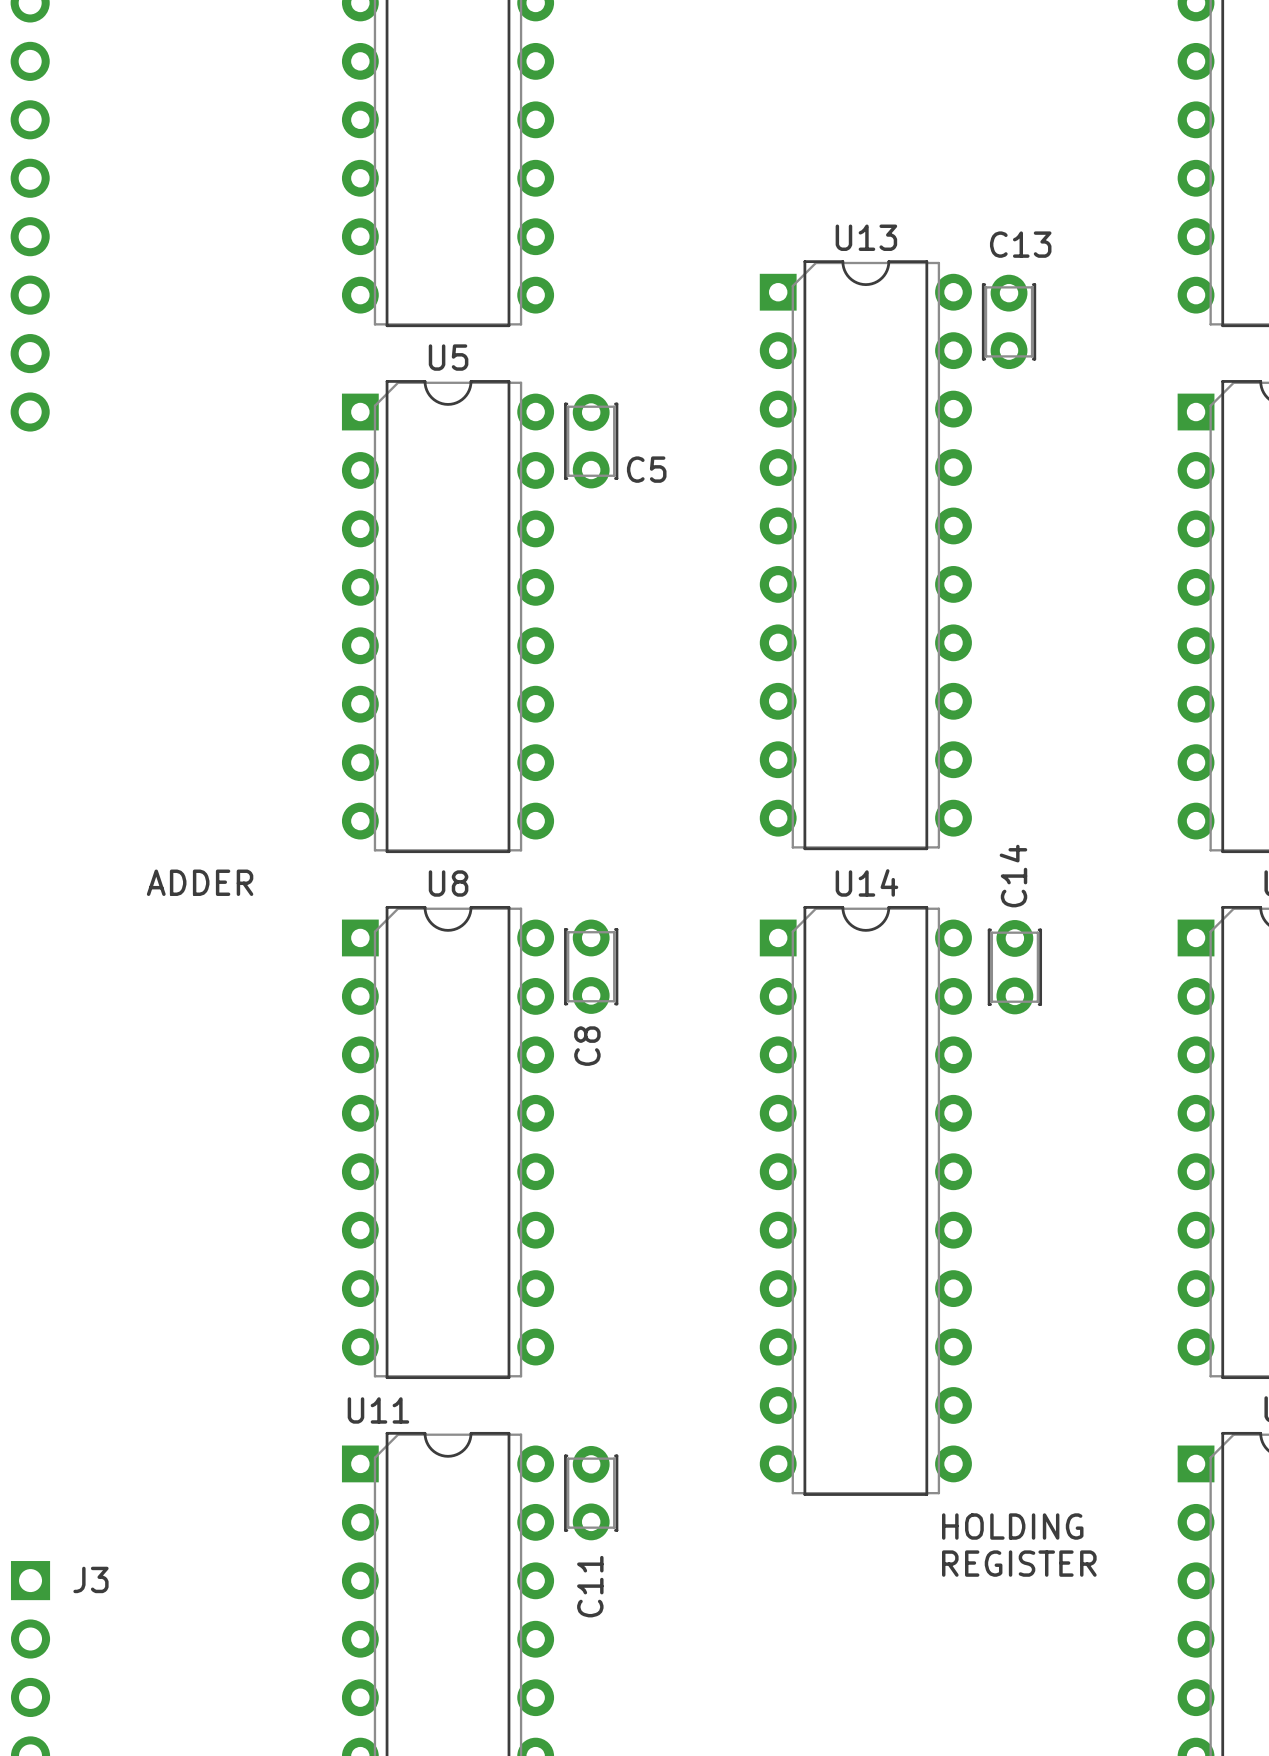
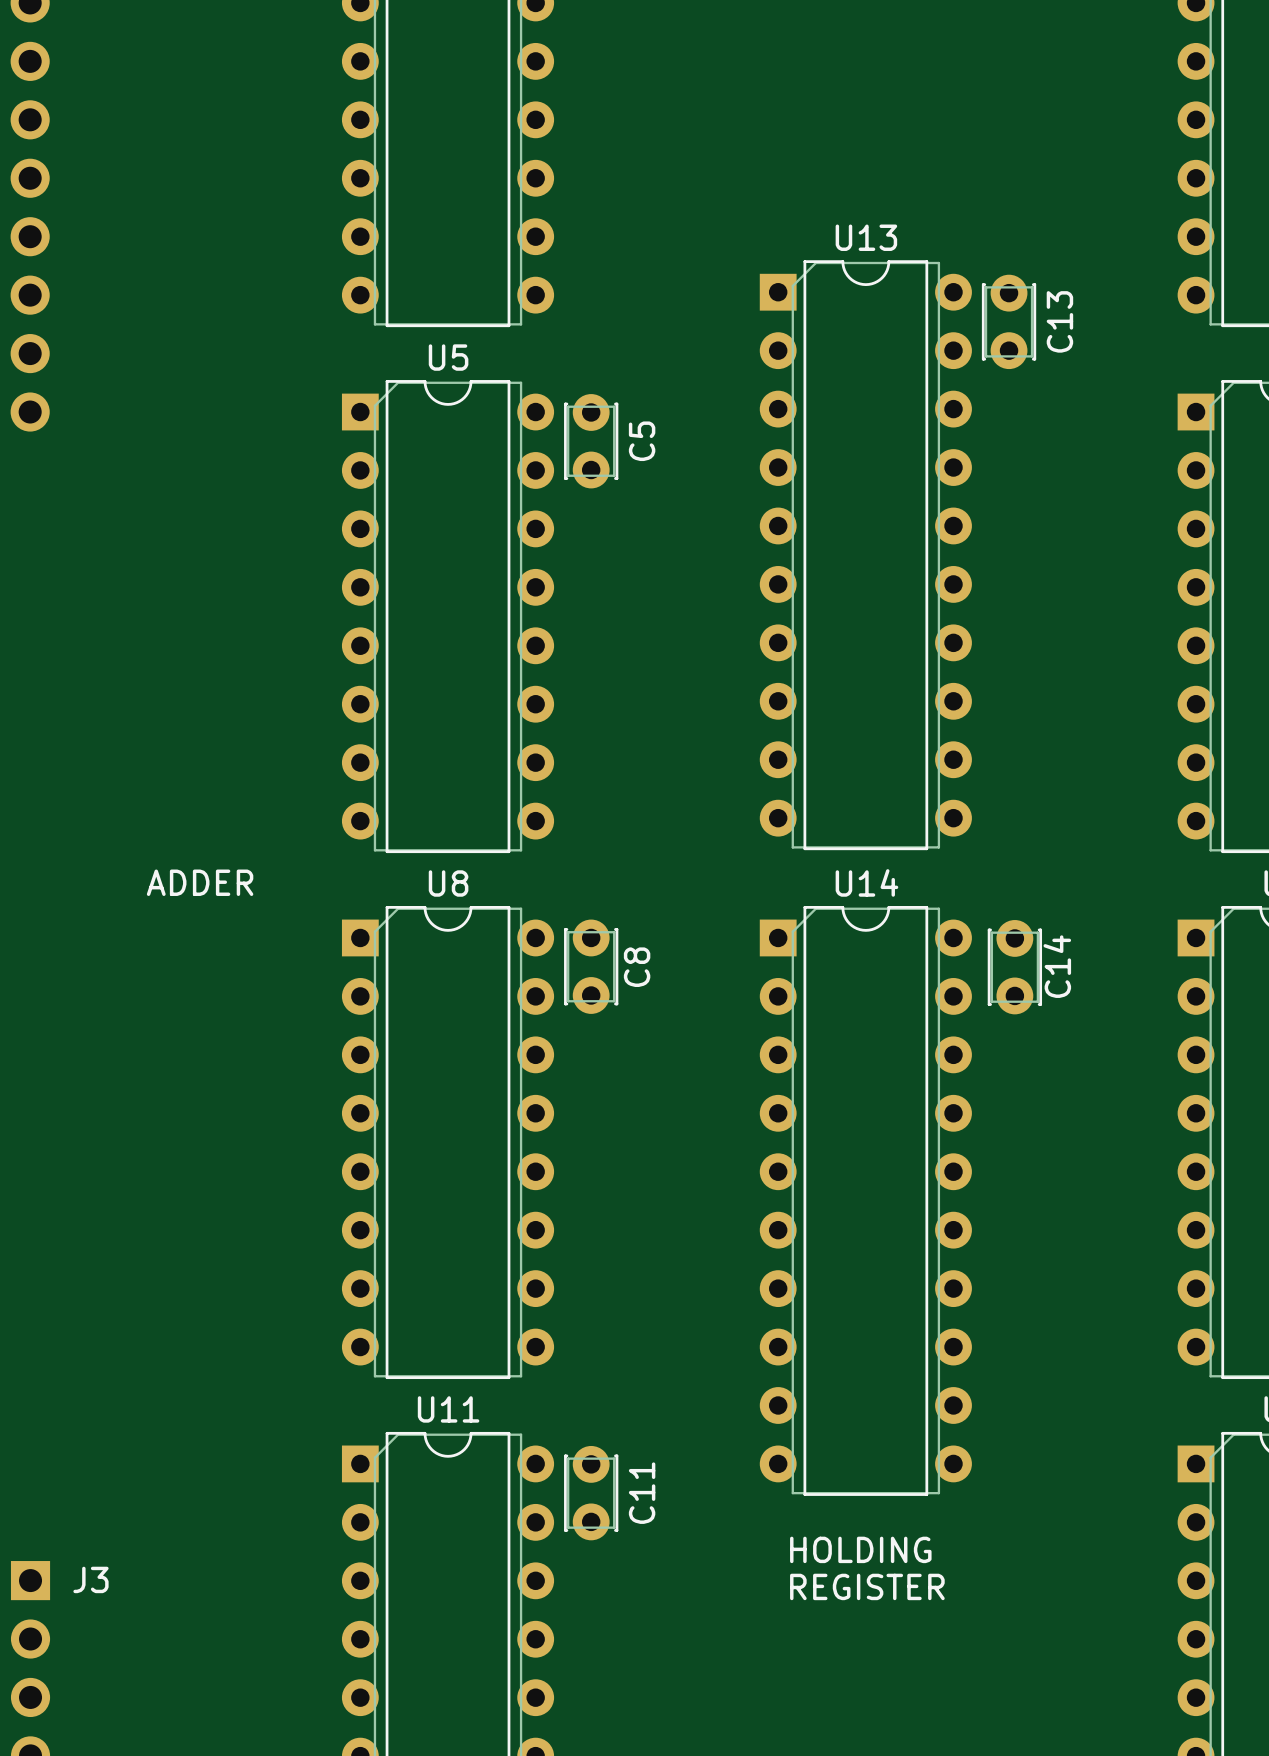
C13 name rotation: 0° (1020, 244) -> 90° counterclockwise (1059, 321)
C13 name position: C13 (1020, 244) -> C13 (1059, 321)
C5 name rotation: 0° (646, 469) -> 90° counterclockwise (642, 441)
C14 name position: C14 (1013, 876) -> C14 (1057, 966)
C8 name position: C8 (587, 1046) -> C8 (637, 967)
U11 name position: U11 (378, 1410) -> U11 (448, 1409)
text position: HOLDING (1012, 1526) -> HOLDING (860, 1549)
text position: REGISTER (1019, 1563) -> REGISTER (867, 1586)
C11 name position: C11 (590, 1586) -> C11 (642, 1493)

